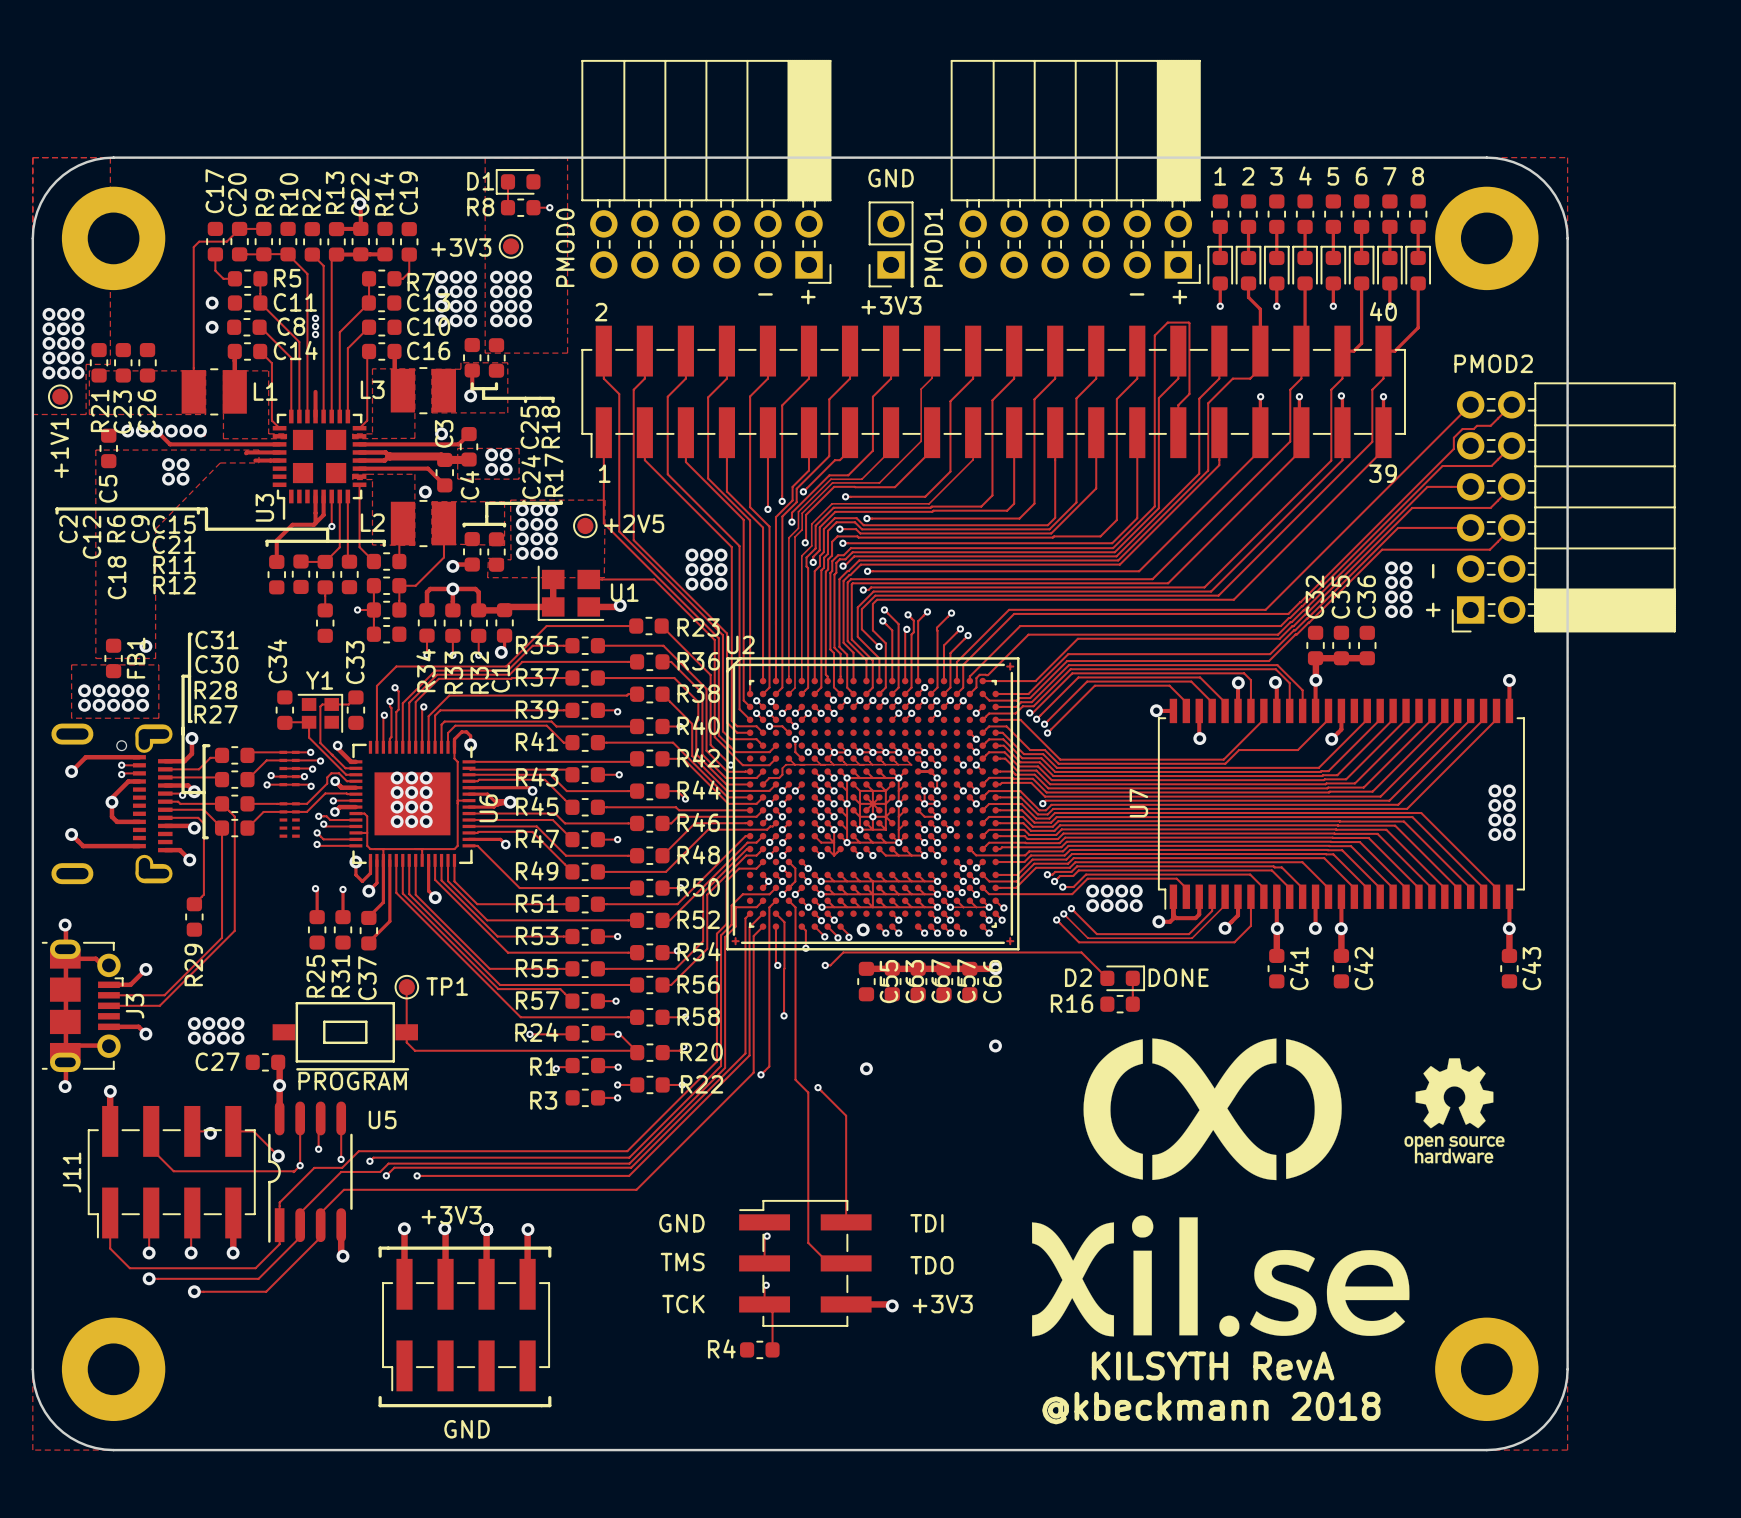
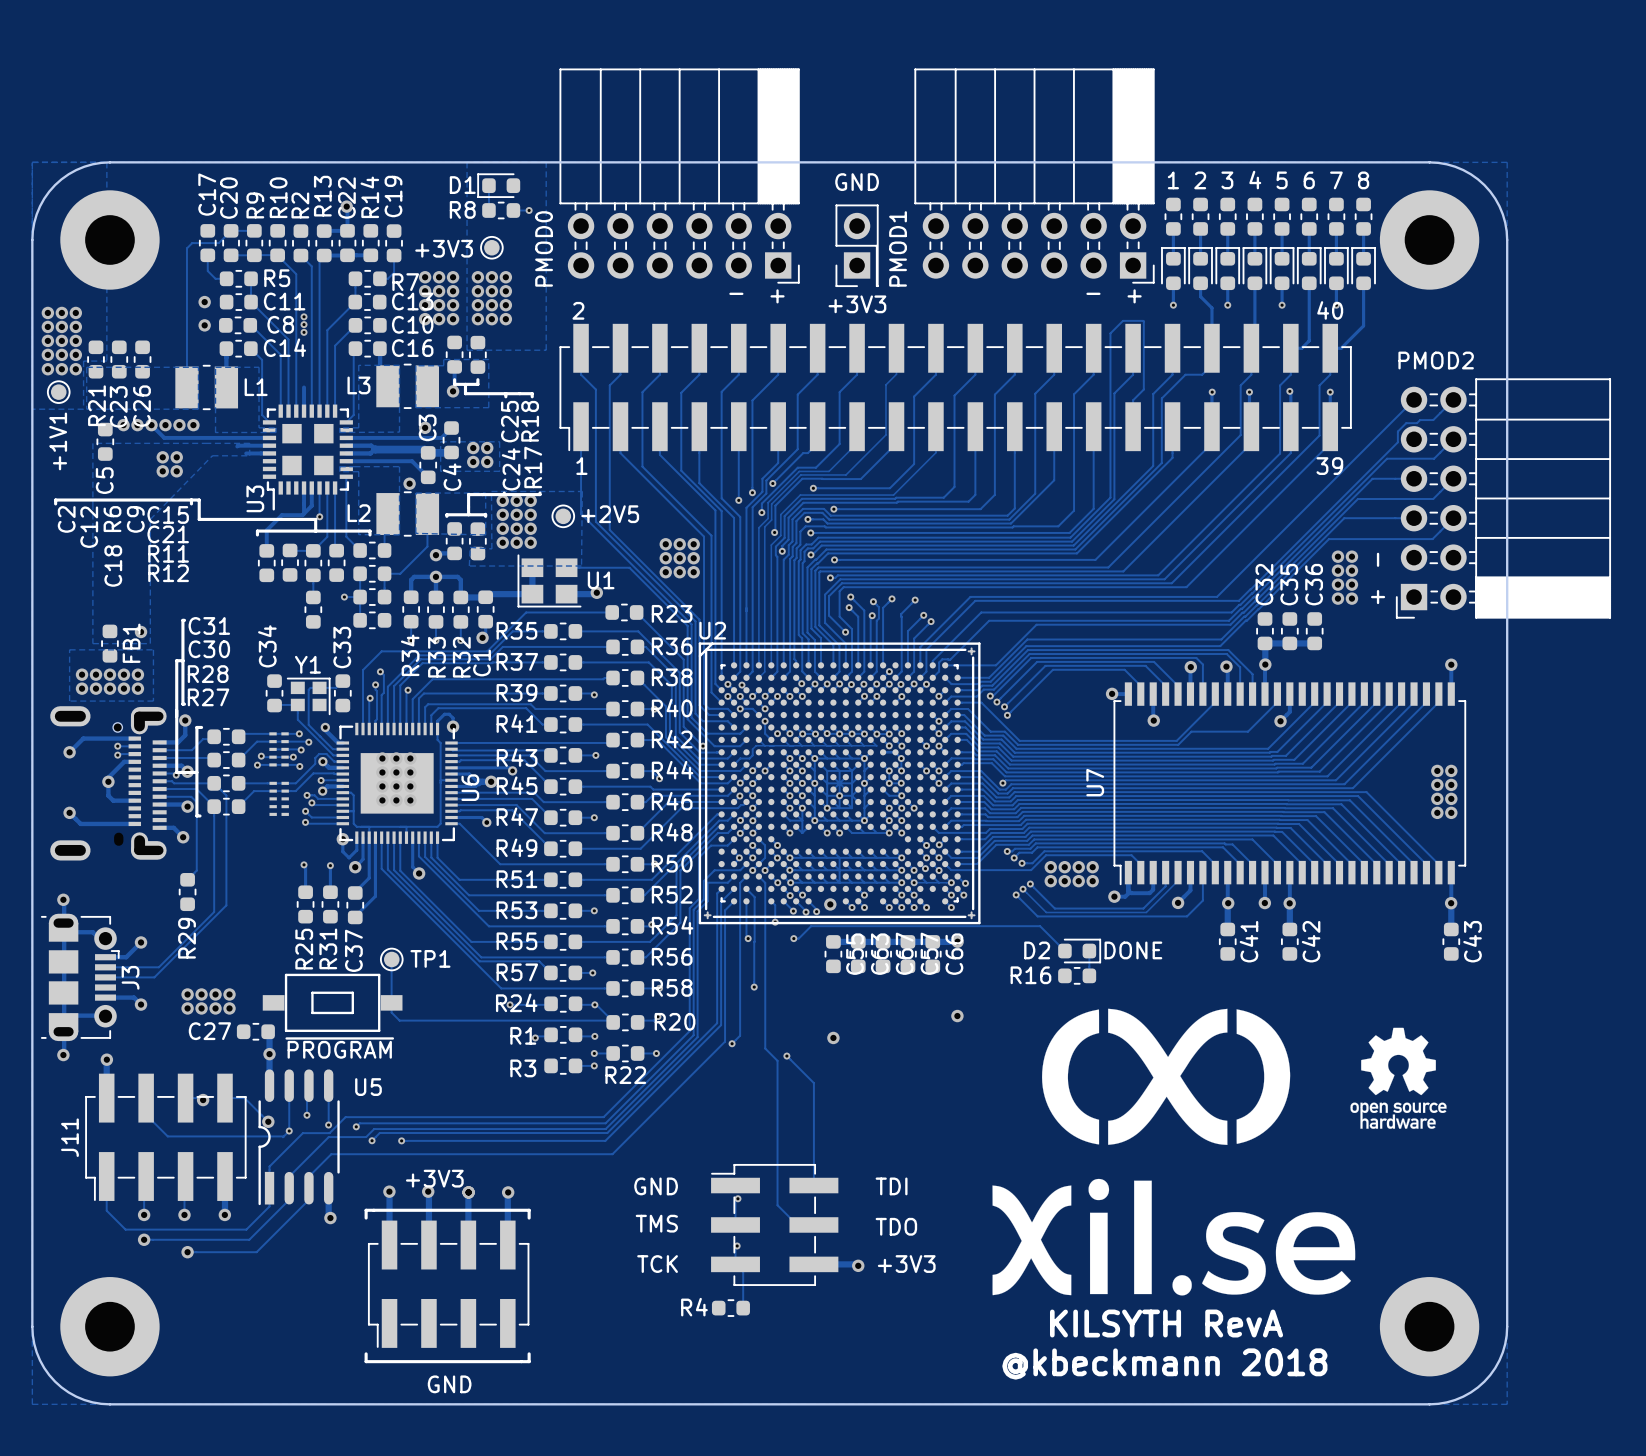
R22 name position: R22 (702, 1084) -> R22 (625, 1075)

